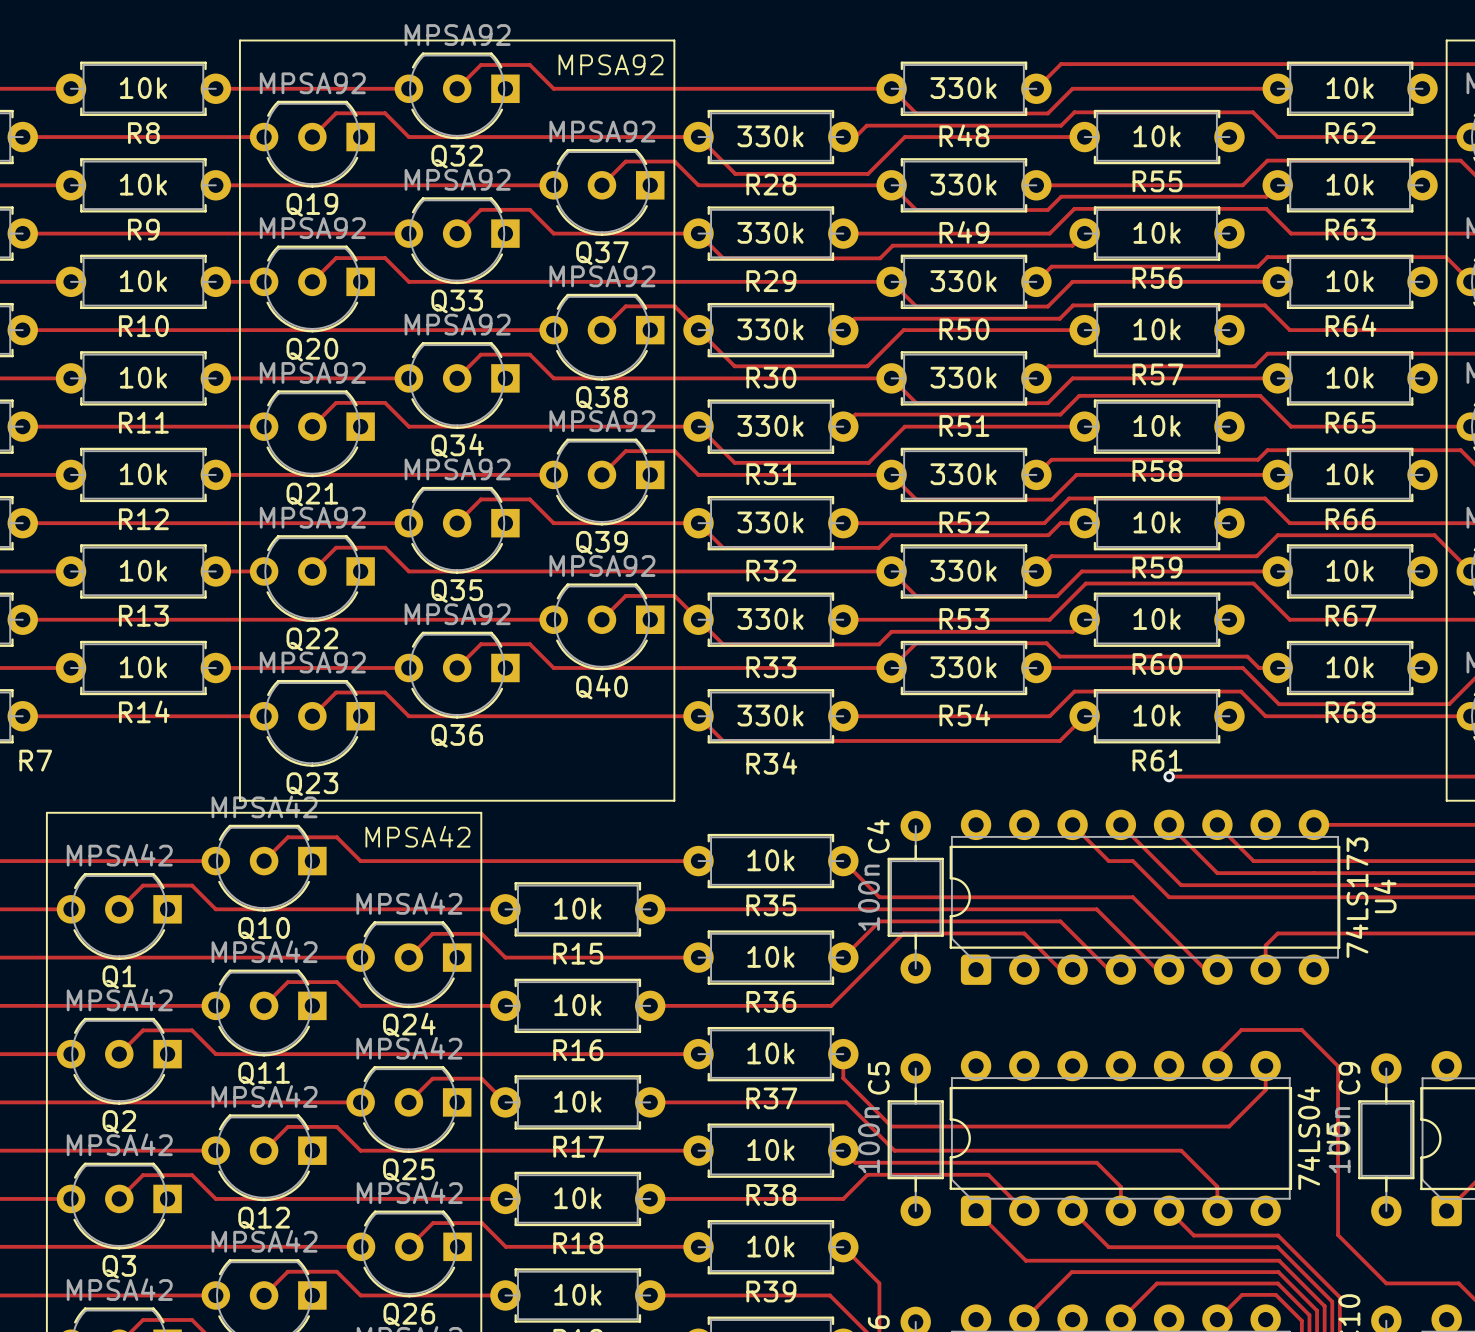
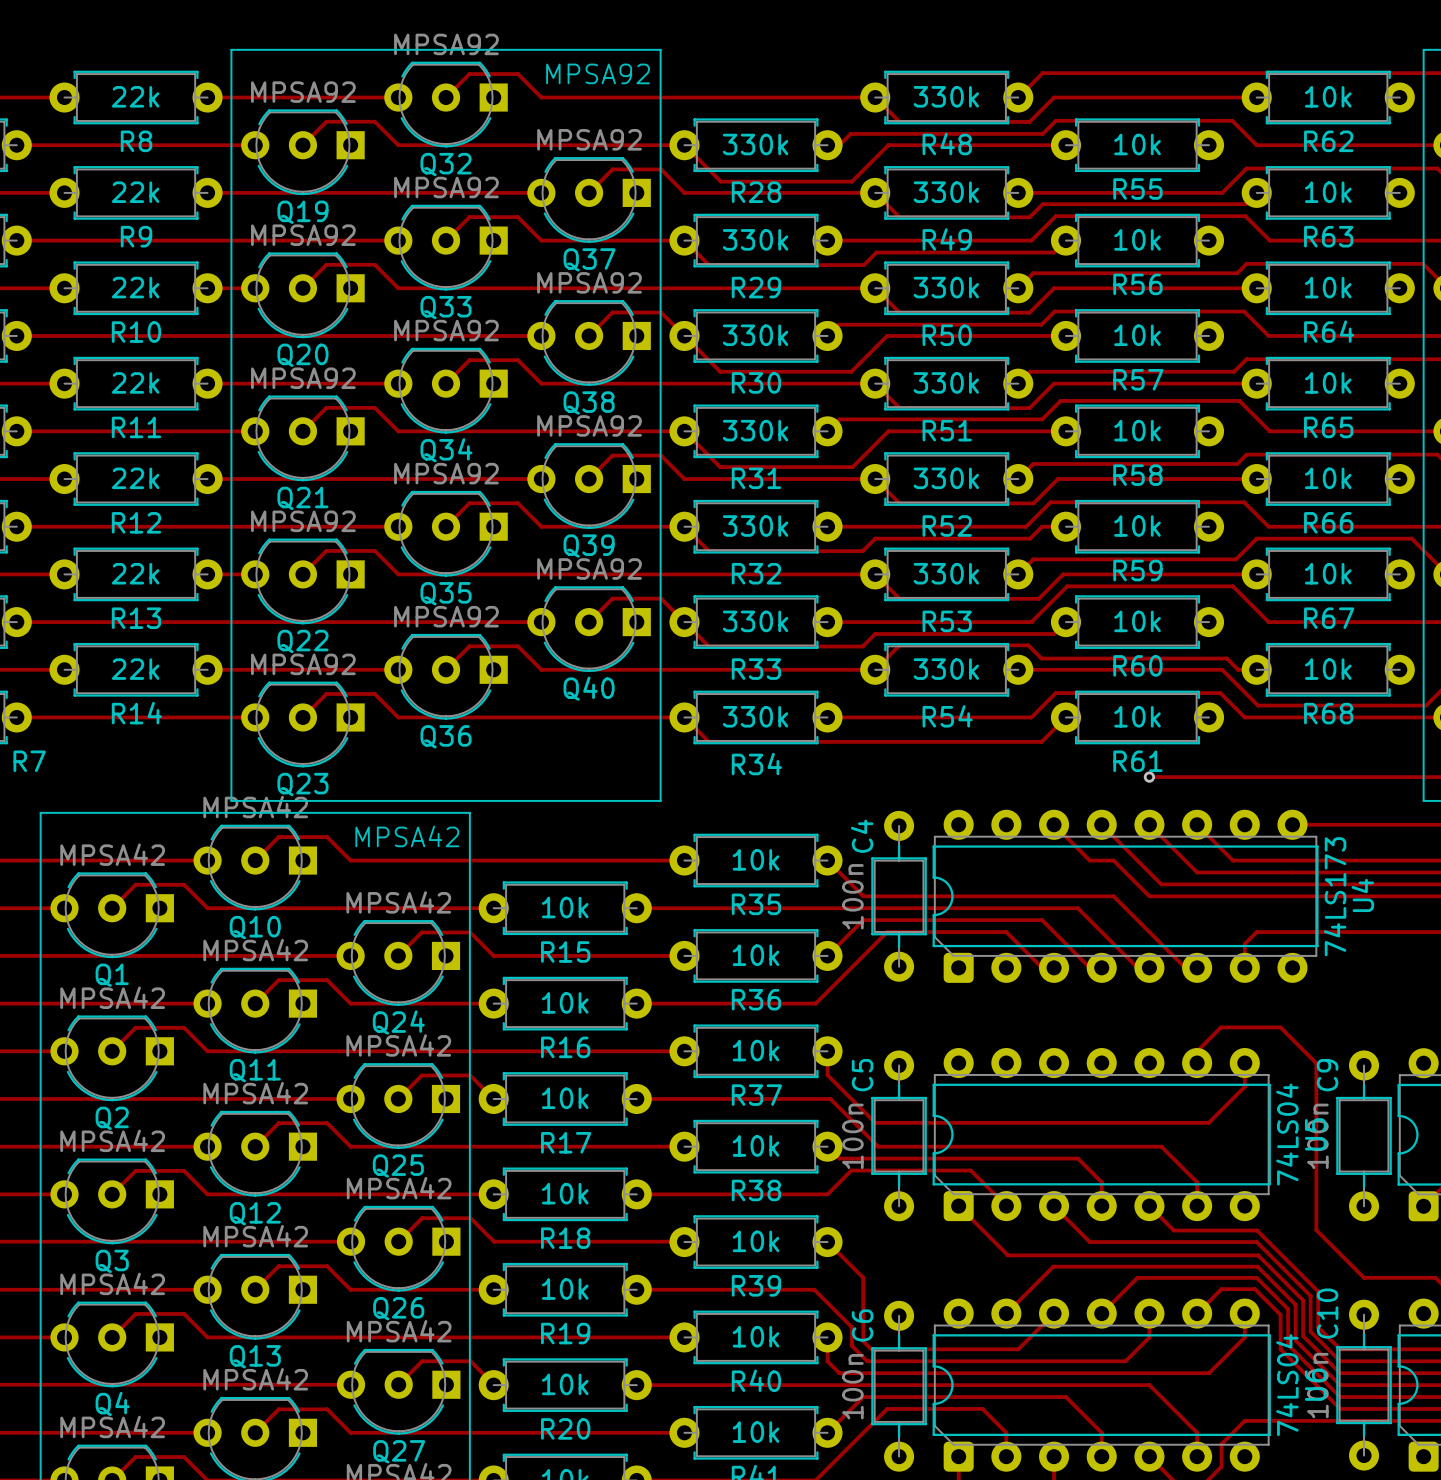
R8 value: 10k (143, 88) -> 22k (135, 96)
R9 value: 10k (143, 184) -> 22k (135, 192)
R10 value: 10k (143, 281) -> 22k (135, 287)
R11 value: 10k (143, 377) -> 22k (135, 382)
R12 value: 10k (143, 474) -> 22k (135, 478)
R13 value: 10k (143, 570) -> 22k (135, 573)
R14 value: 10k (143, 667) -> 22k (135, 669)

